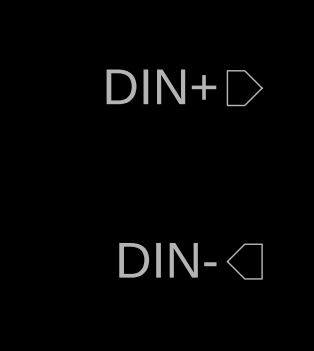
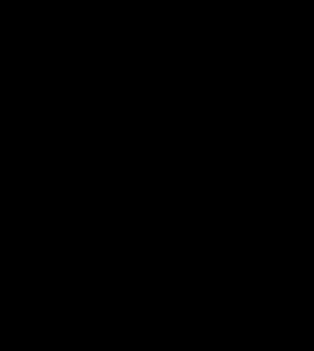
hierarchical label: DIN+ (161, 86) -> none
hierarchical label: DIN- (167, 260) -> none

